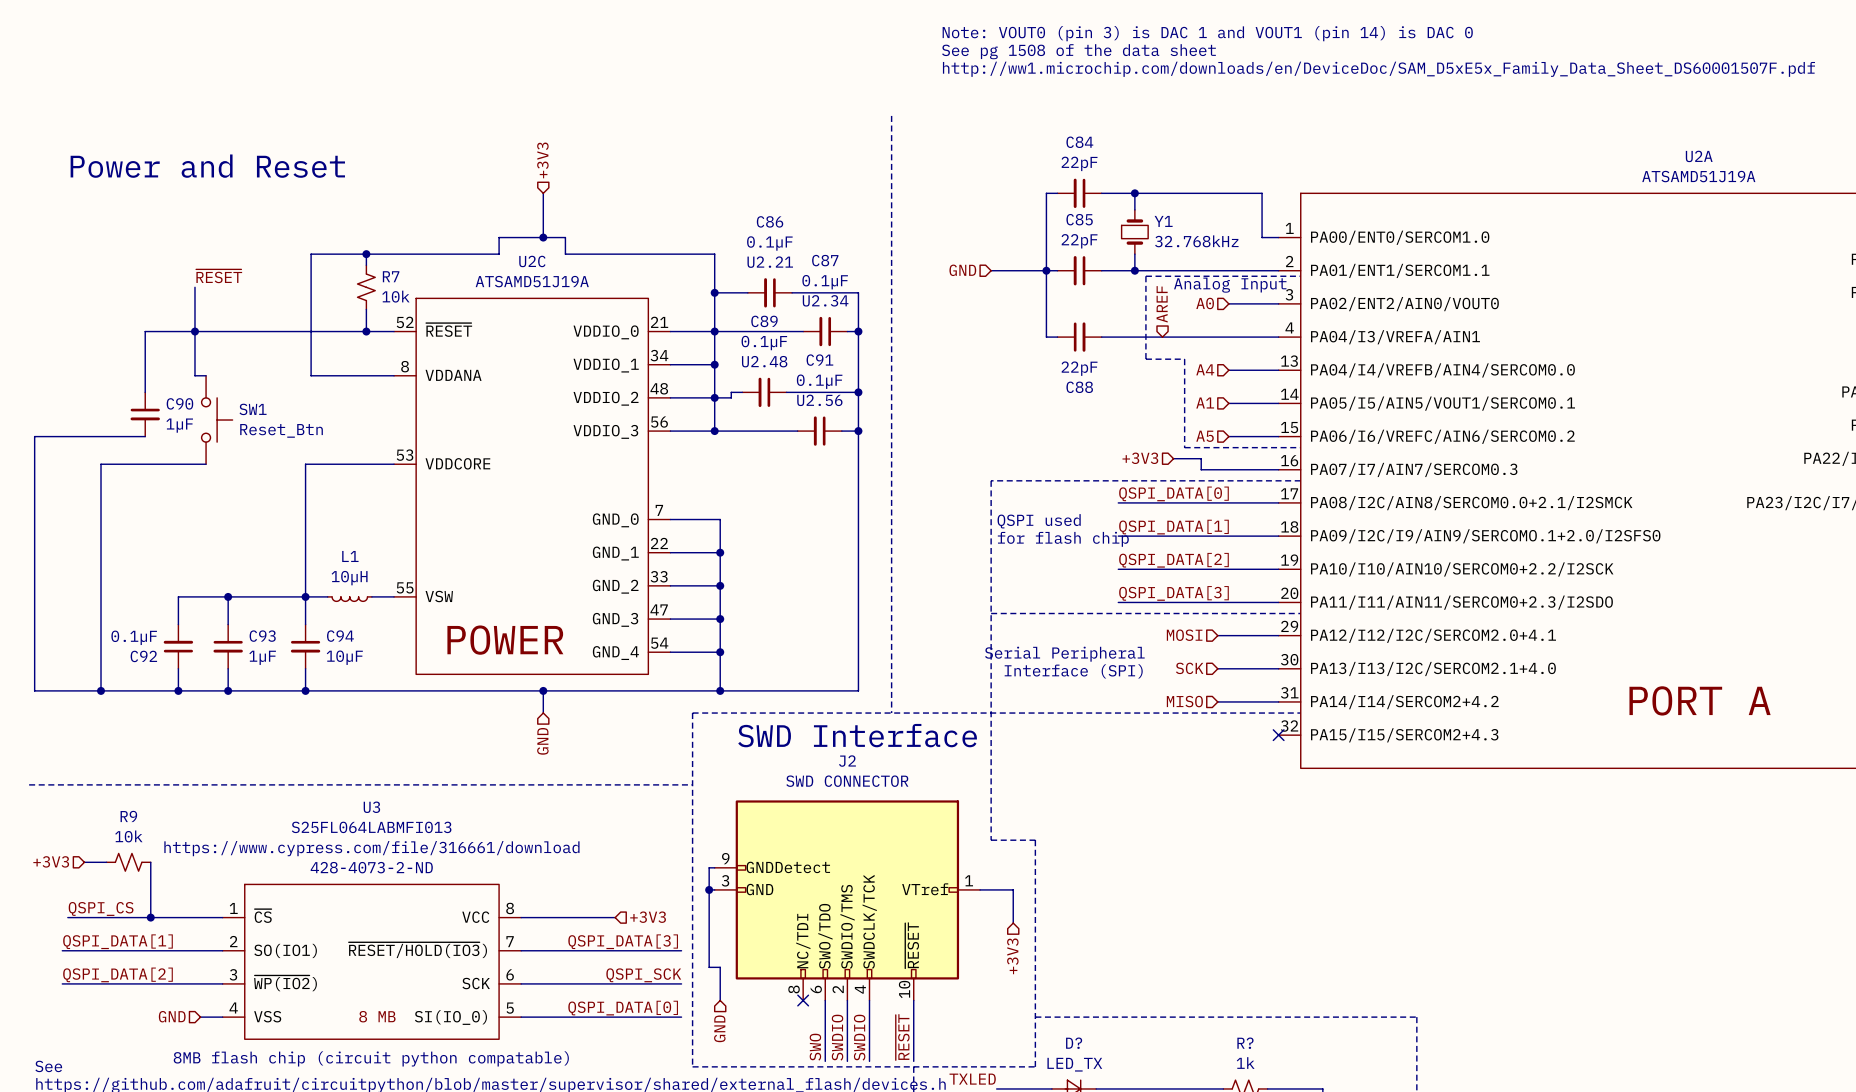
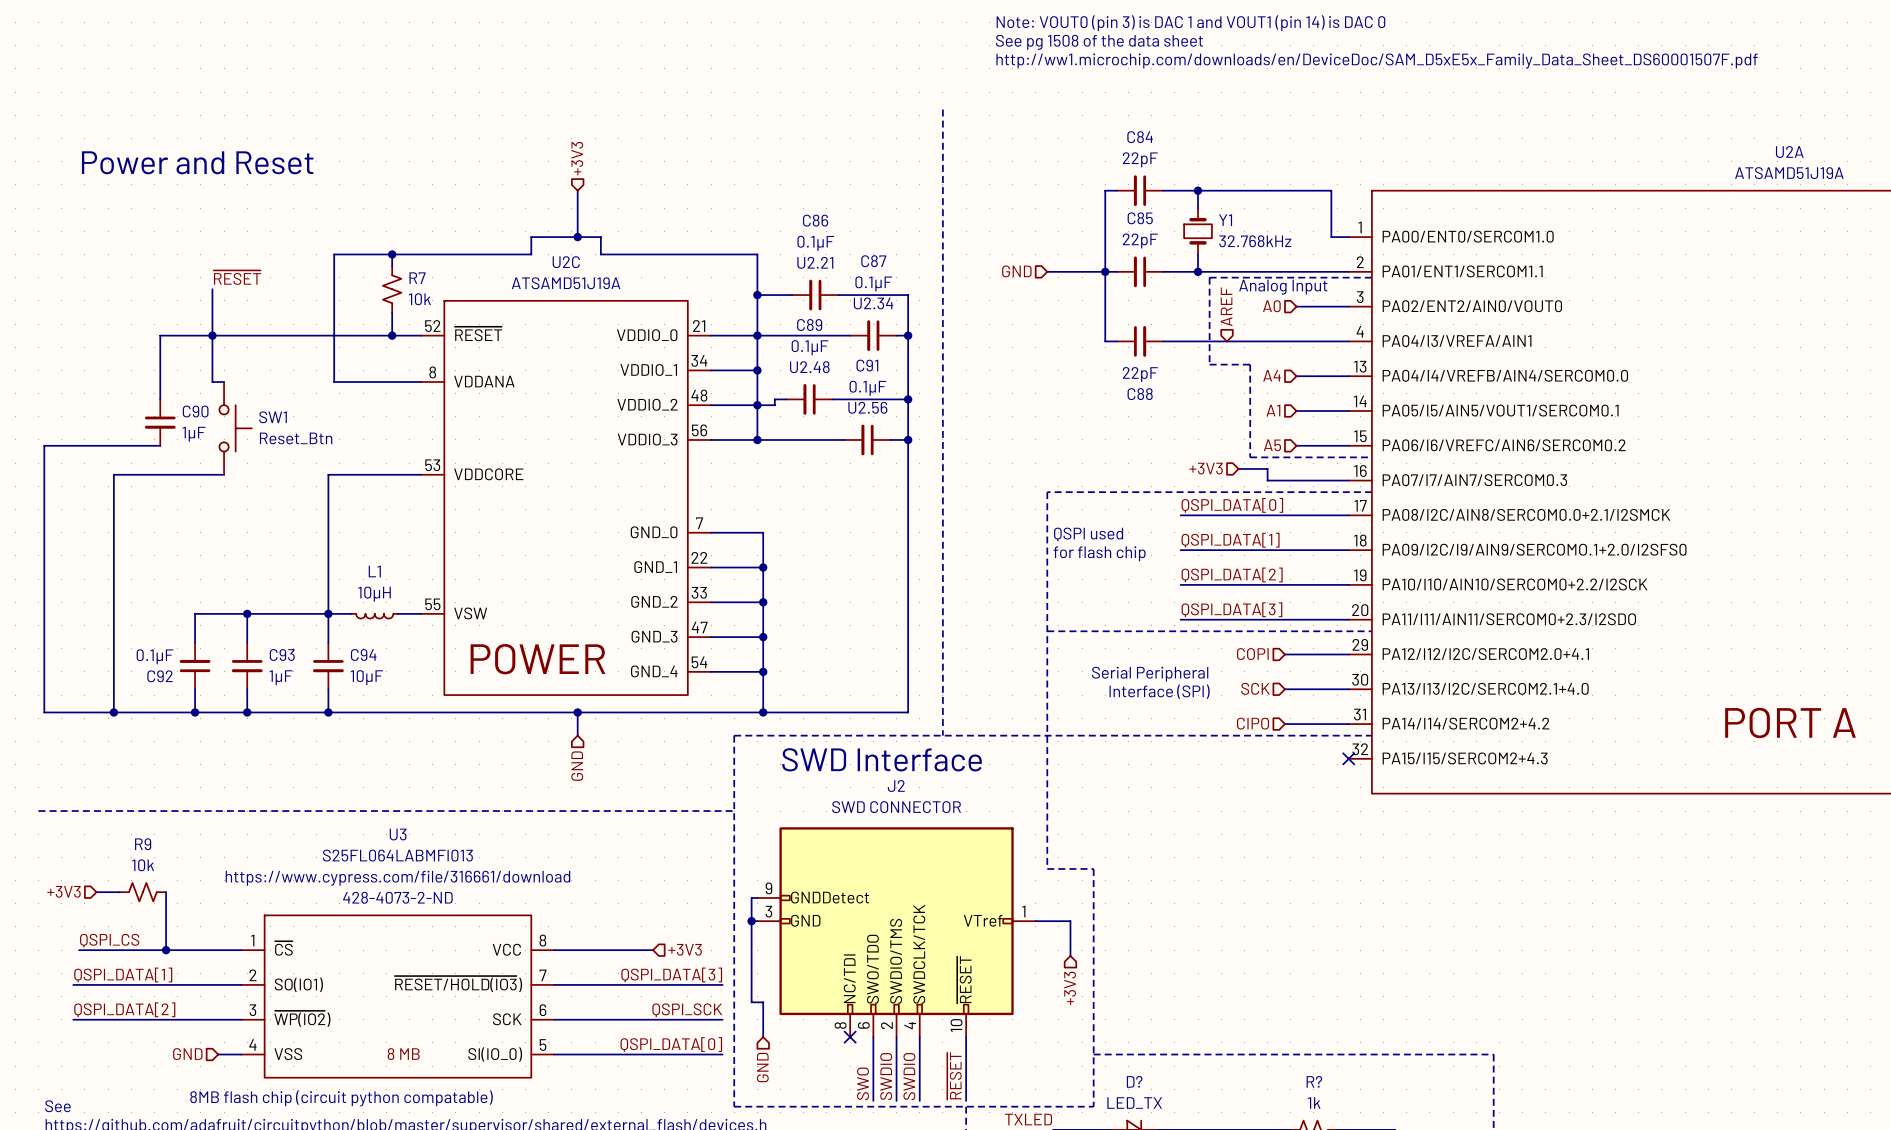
hierarchical label: MOSI (1184, 635) -> COPI (1252, 654)
hierarchical label: MISO (1184, 701) -> CIPO (1253, 723)

